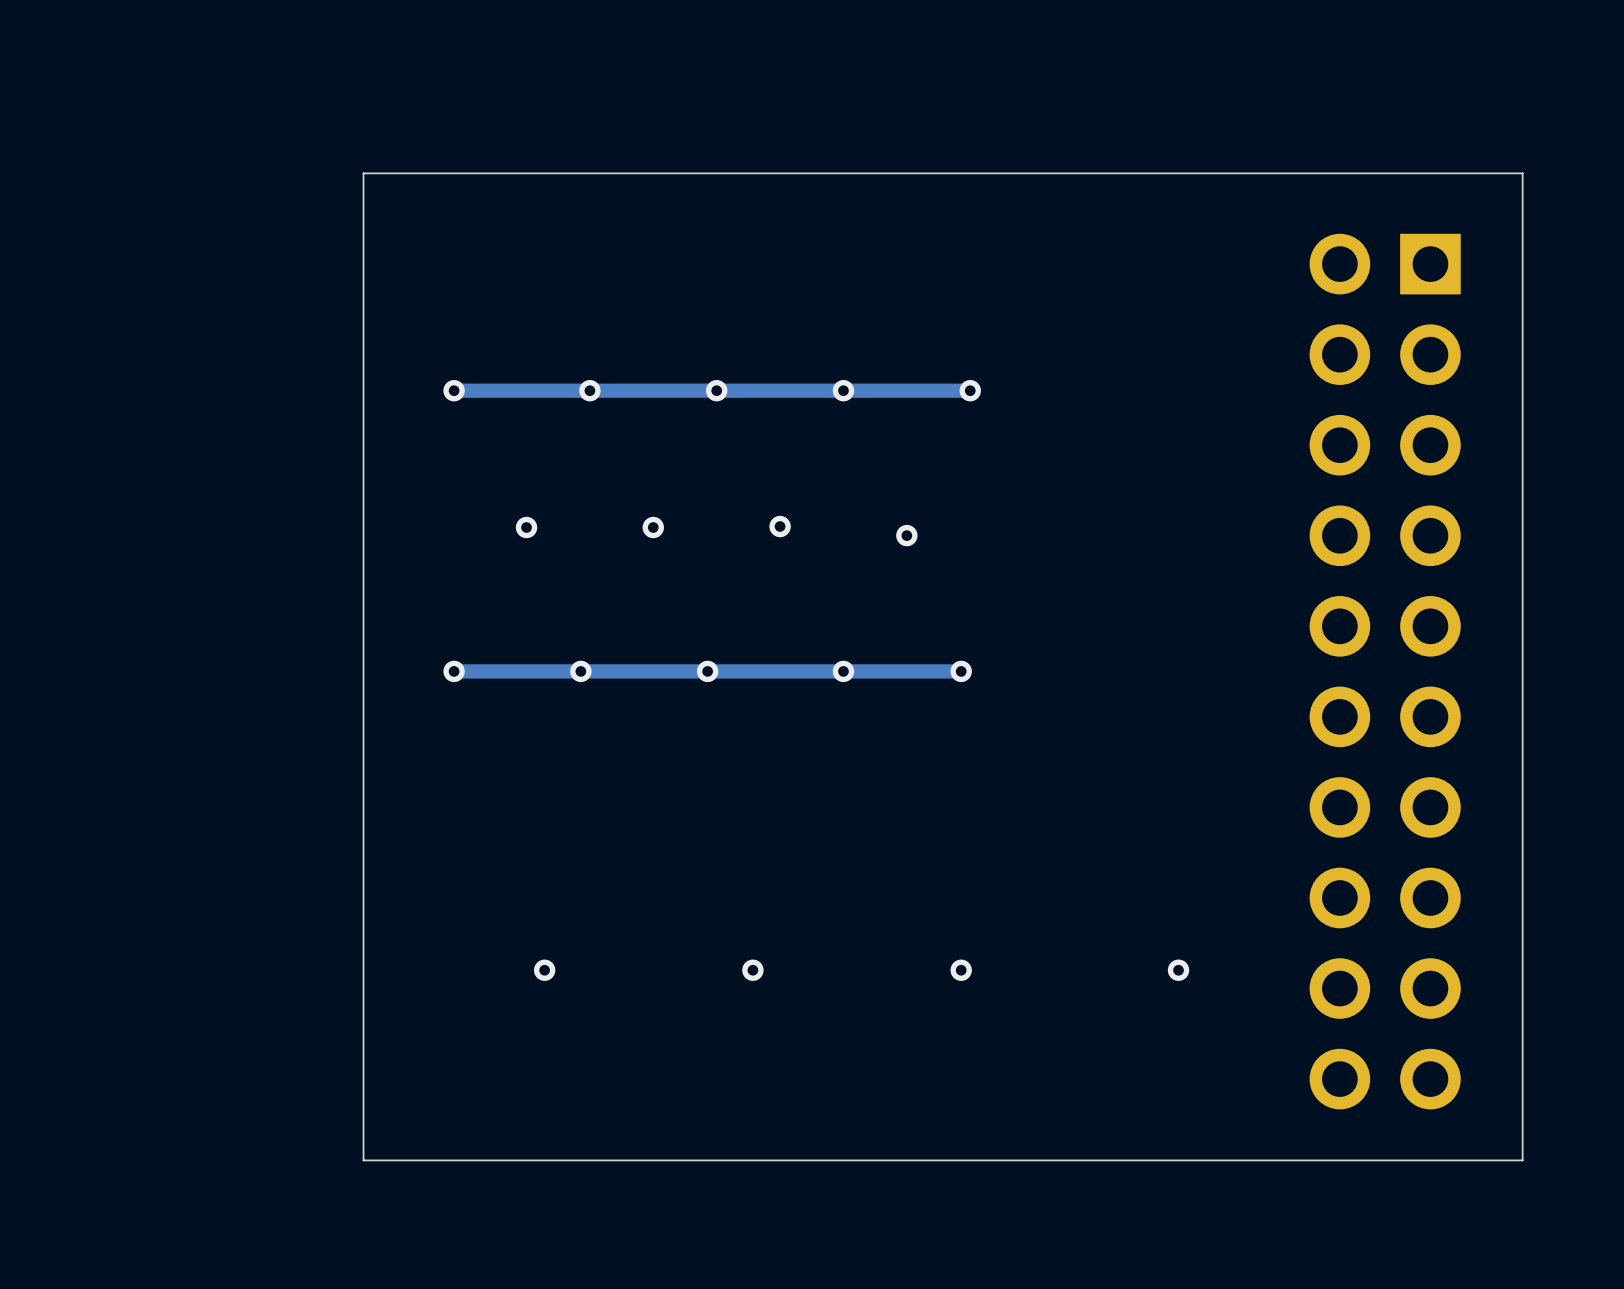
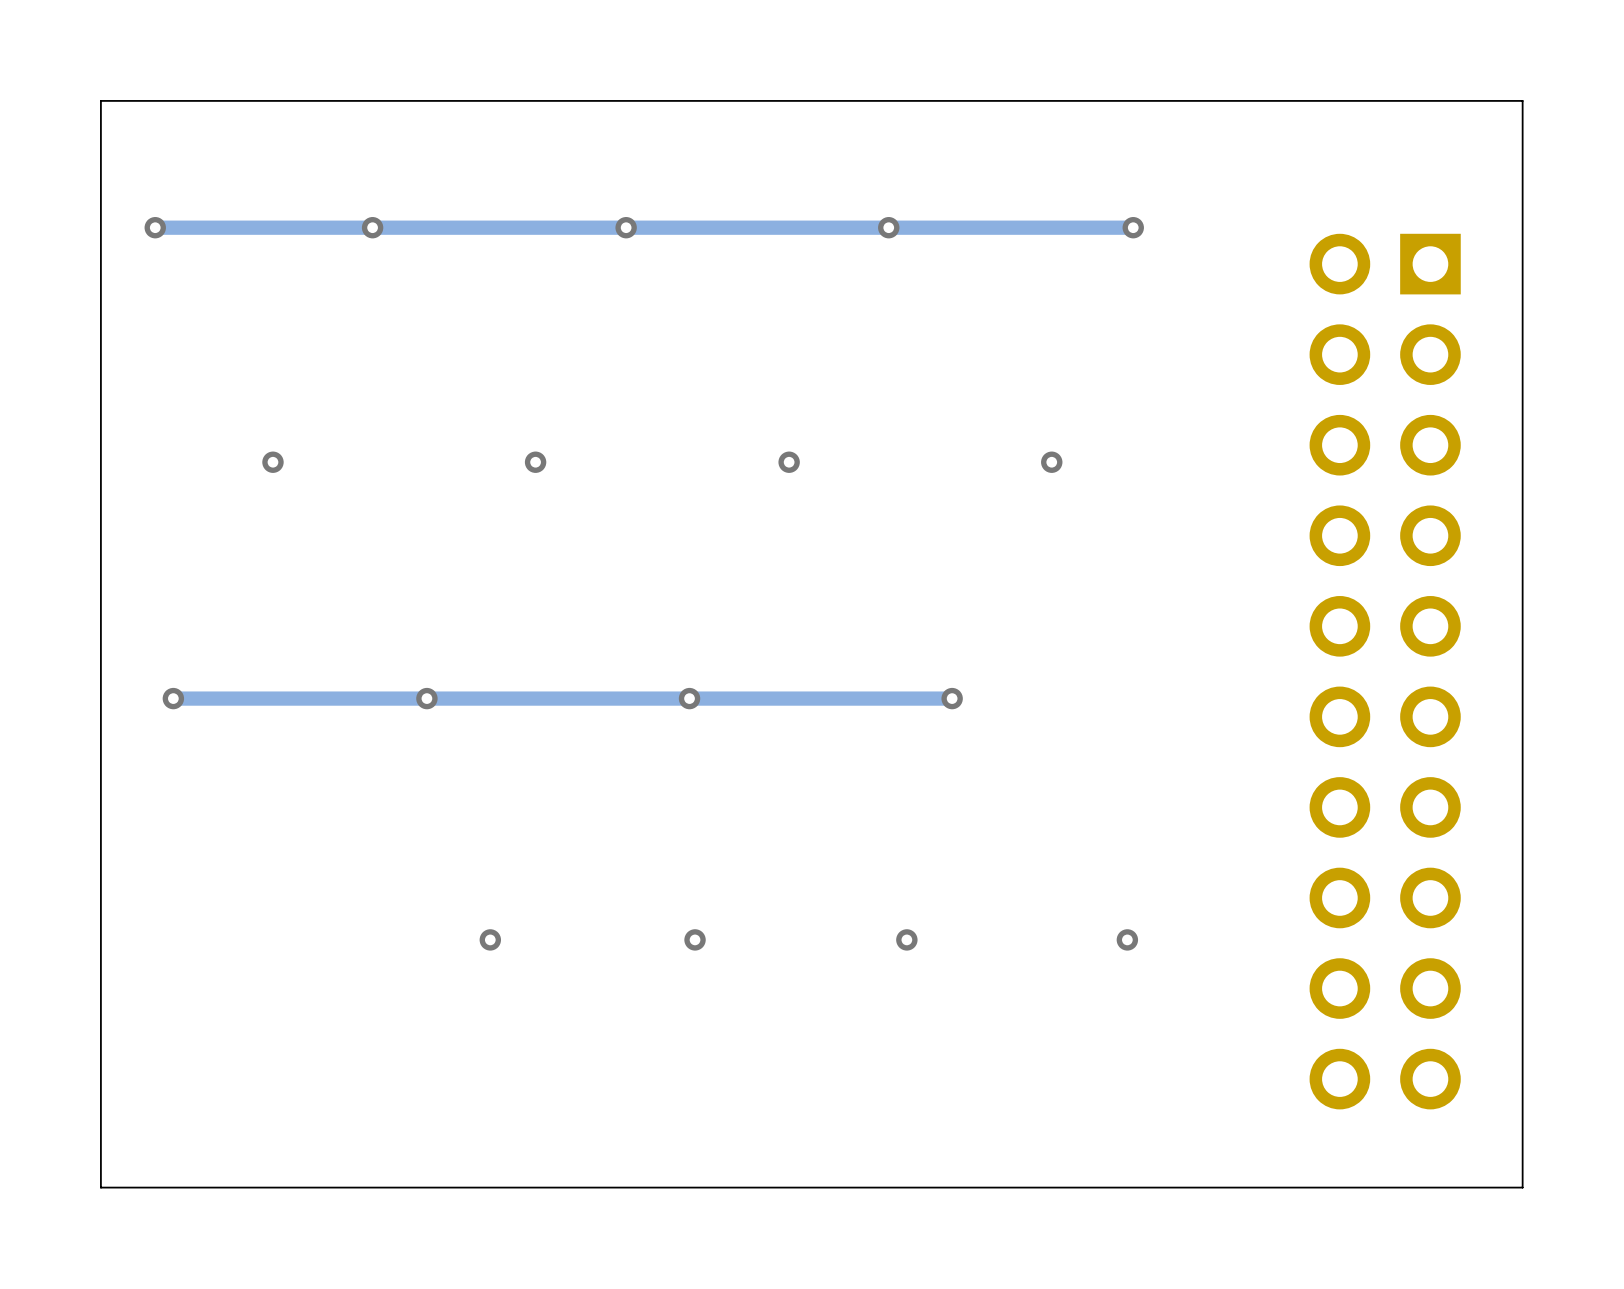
board edge: (1522, 173) (363, 173) (363, 1160) (1522, 1160) -> (1522, 173) (1522, 100) (100, 100) (100, 1187) (1522, 1187) (1522, 1160)
via: none -> (155, 227)
via: none -> (372, 227)
via: none -> (626, 227)
via: none -> (888, 227)
track: none -> (1133, 227) (155, 227)
via: none -> (1133, 227)
via: (454, 390) -> none
via: (589, 390) -> none
via: (716, 390) -> none
via: (843, 390) -> none
track: (970, 390) (454, 390) -> none
via: (970, 390) -> none
via: none -> (272, 462)
via: none -> (535, 462)
via: none -> (789, 462)
via: none -> (1051, 462)
via: (780, 526) -> none
via: (526, 527) -> none
via: (653, 527) -> none
via: (906, 535) -> none
via position: (454, 671) -> (426, 698)
via: (580, 671) -> none
via position: (707, 671) -> (689, 698)
via: (843, 671) -> none
track: (961, 671) (454, 671) -> none
via position: (961, 671) -> (952, 698)
via: none -> (173, 698)
track: none -> (952, 698) (173, 698)
via position: (544, 970) -> (490, 939)
via position: (752, 970) -> (695, 939)
via position: (961, 970) -> (906, 939)
via position: (1178, 970) -> (1127, 939)

